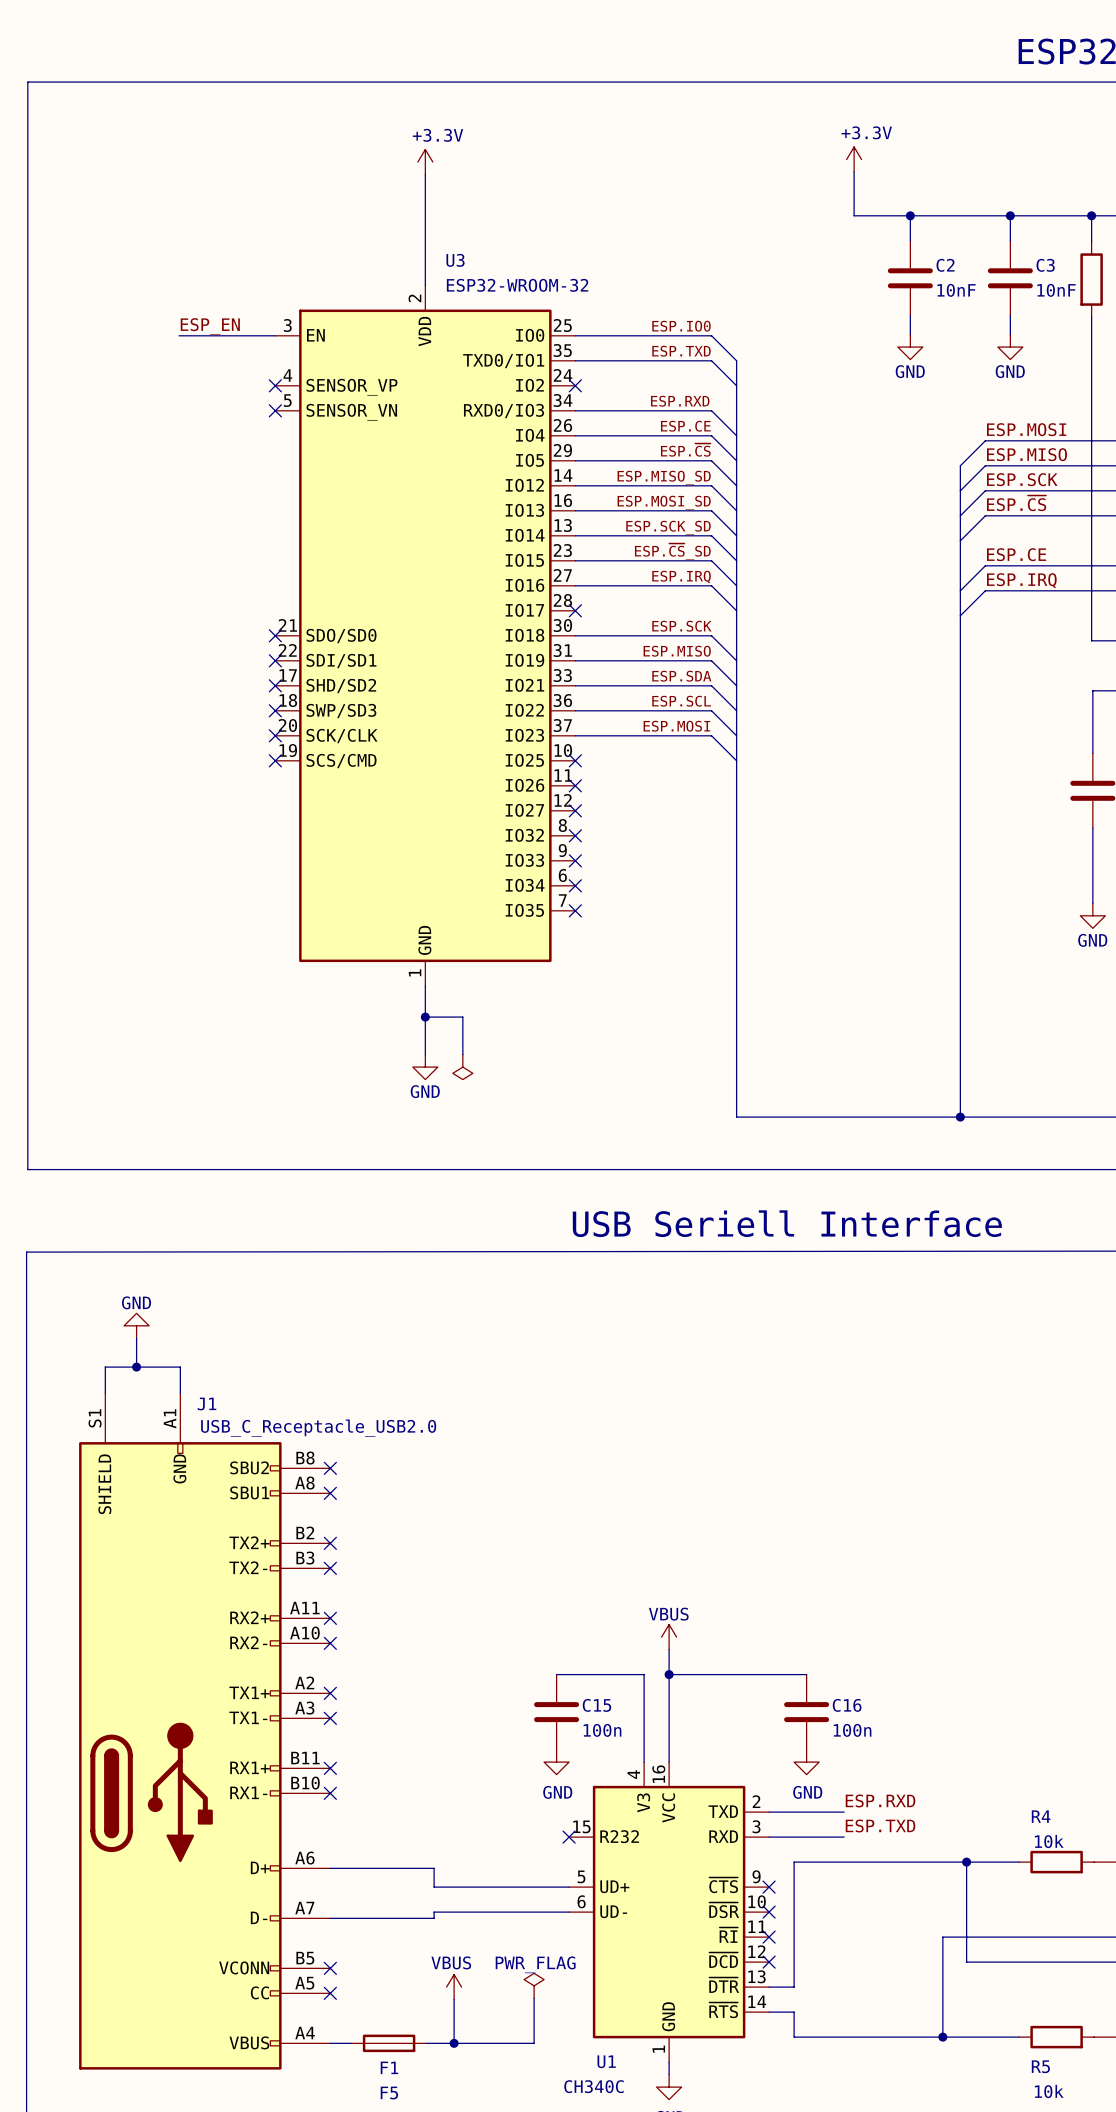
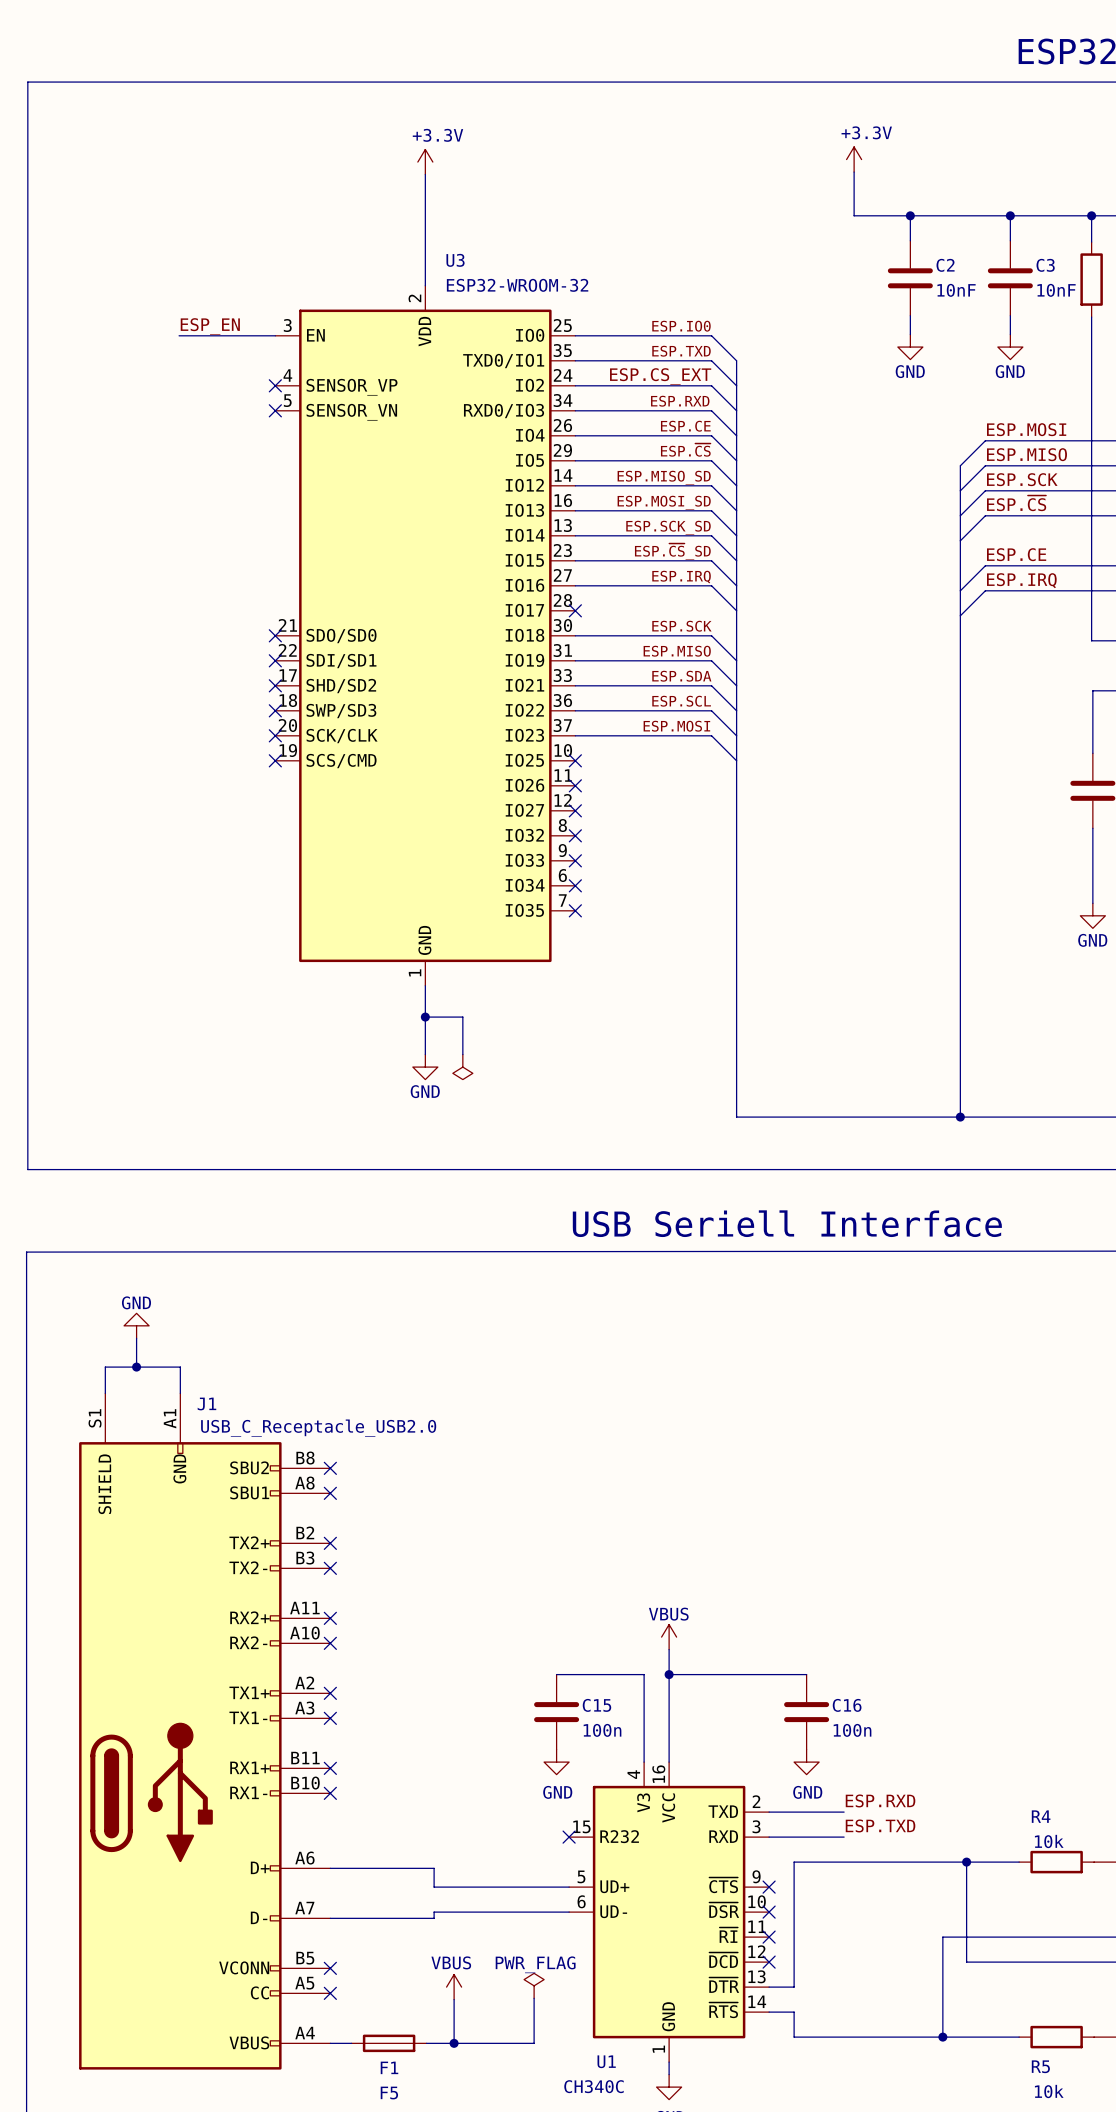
label: none -> ESP.CS_EXT (660, 376)
wire: none -> (575, 385) (711, 385) (736, 410)
no-connect mark: (575, 385) -> none

